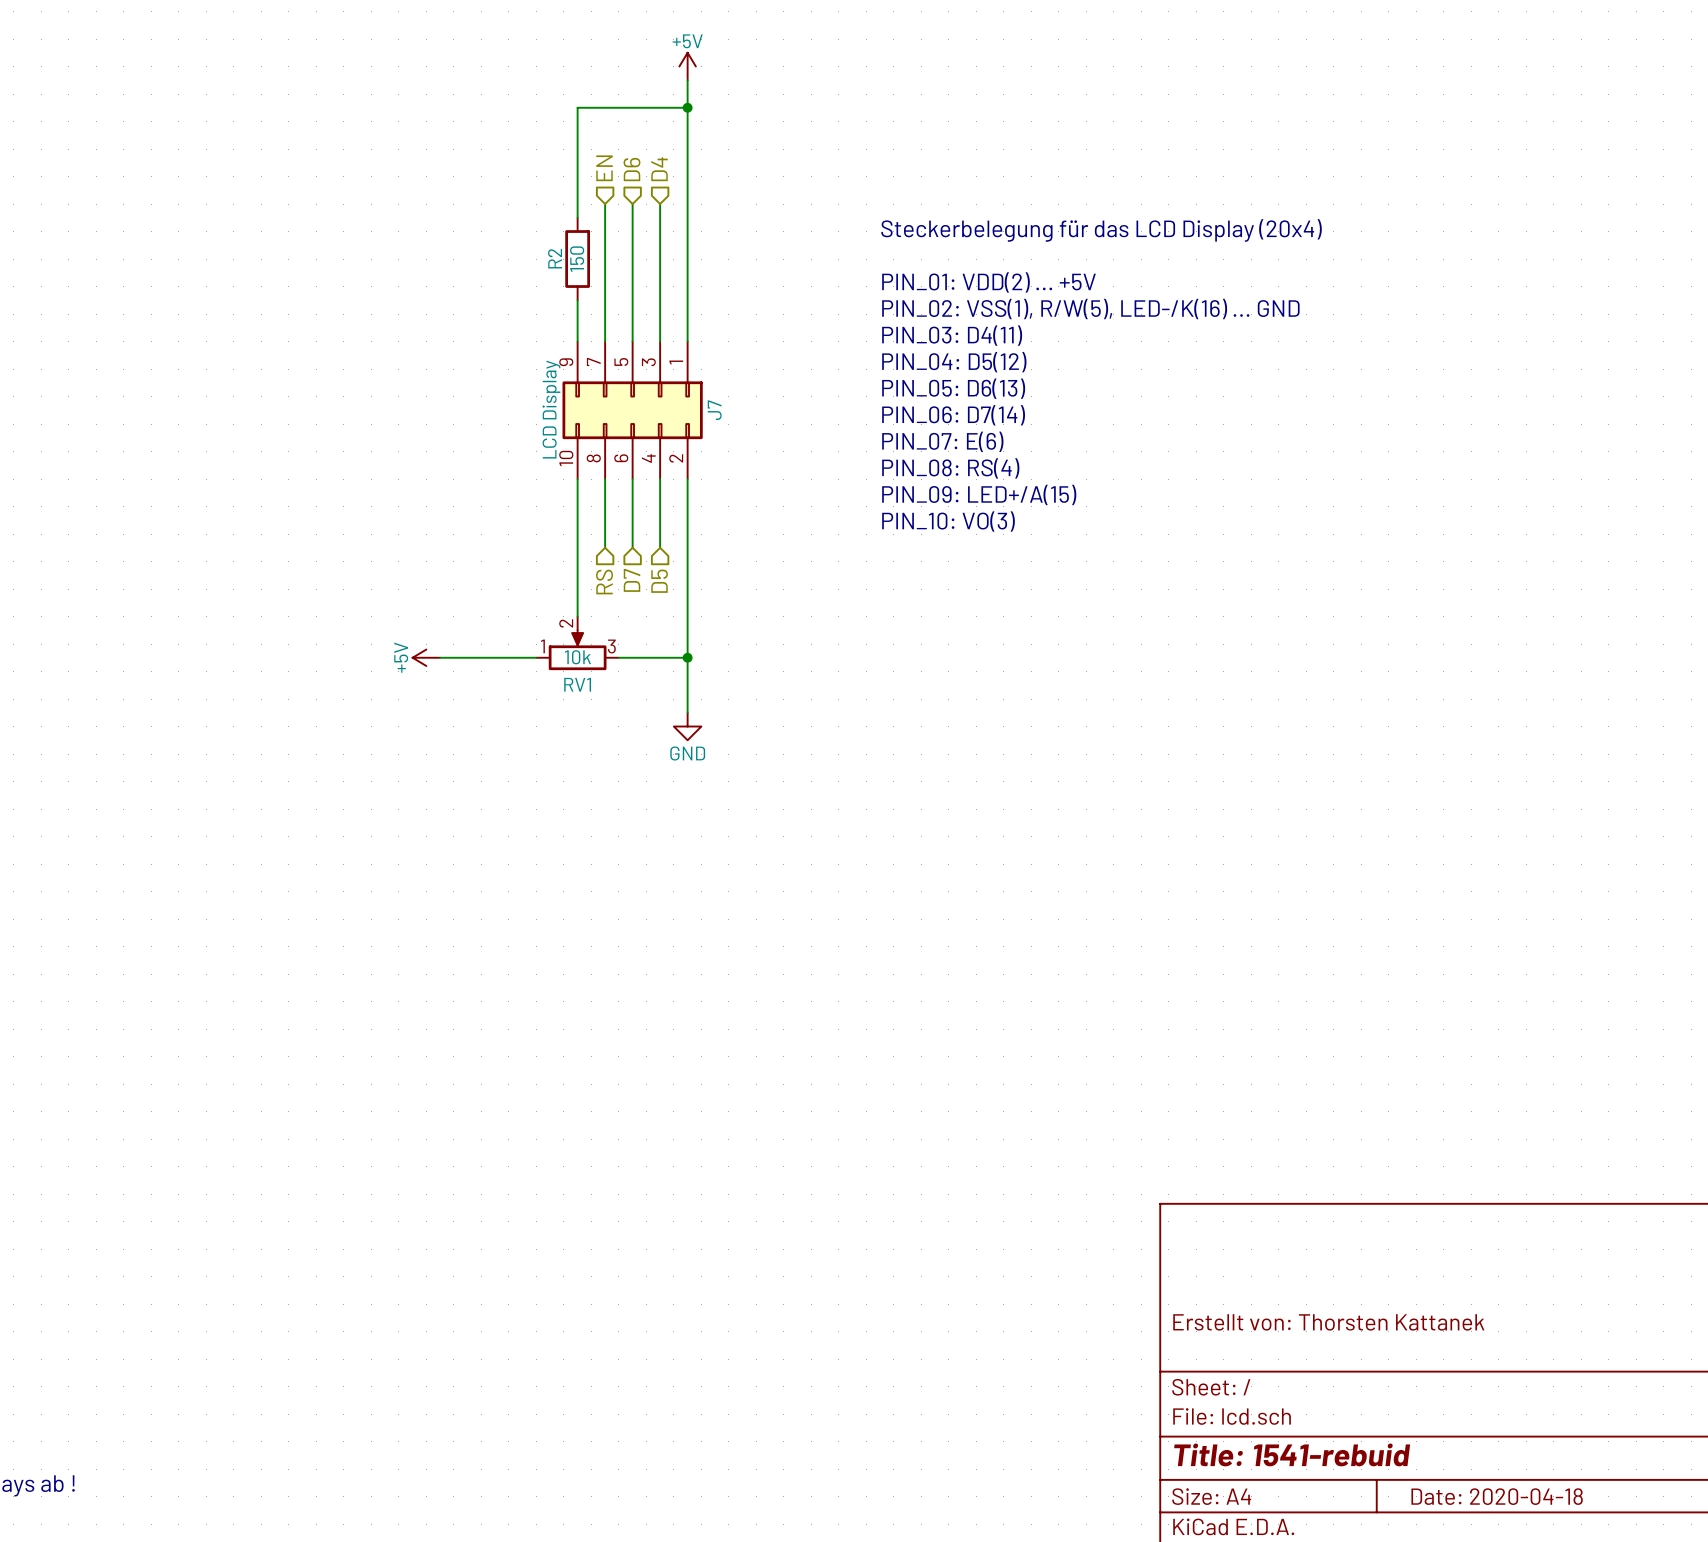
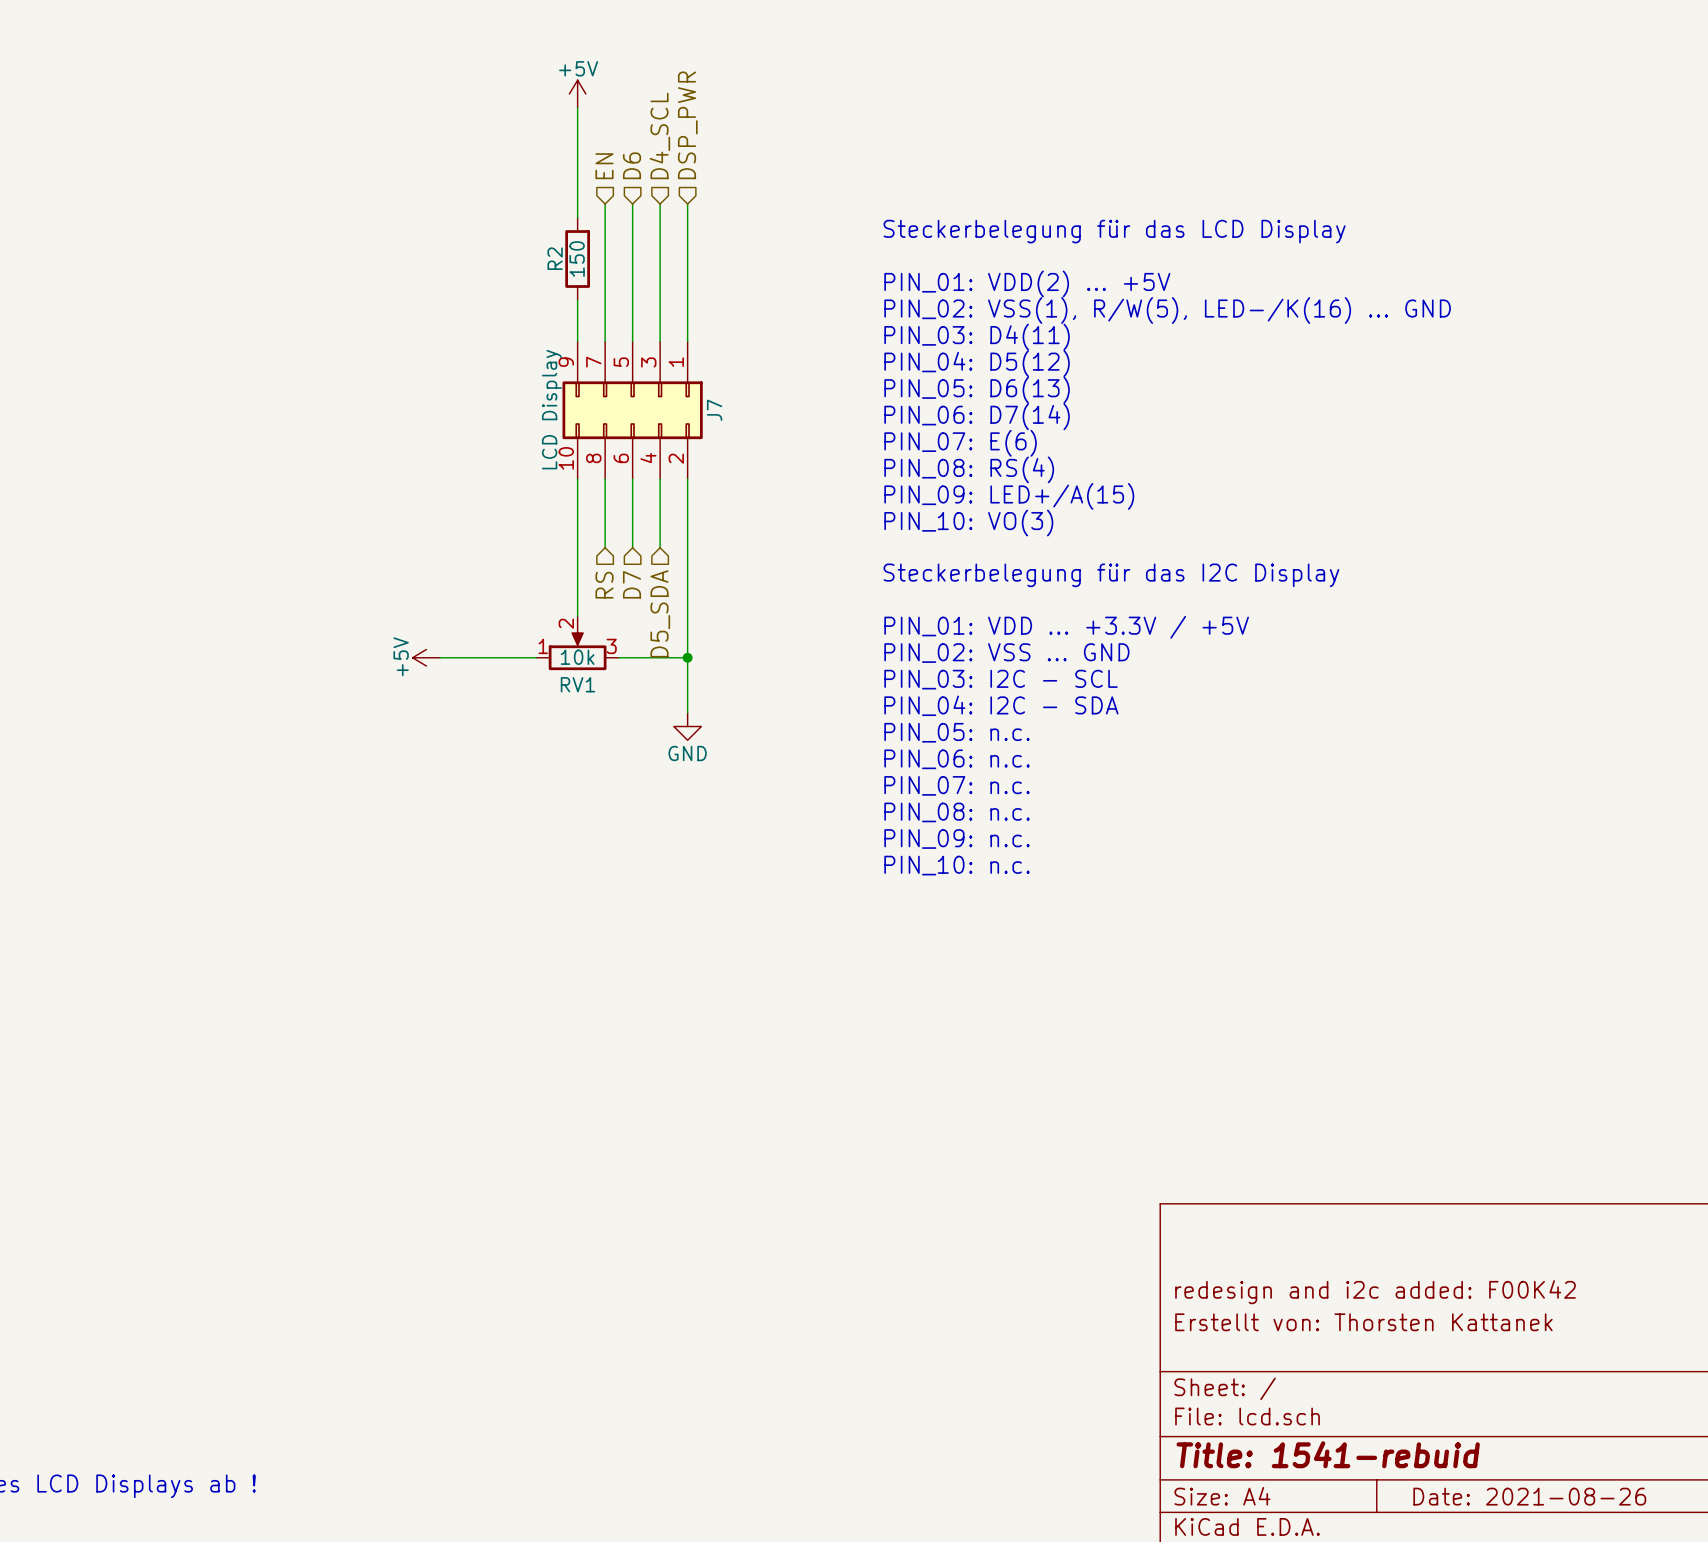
power symbol position: +5V (687, 66) -> +5V (577, 94)
wire: (687, 80) (687, 204) -> none
wire: (577, 107) (687, 107) -> none
junction: (687, 107) -> none
hierarchical label: none -> DSP_PWR (687, 125)
hierarchical label: D4 (659, 169) -> D4_SCL (659, 135)
text: Steckerbelegung für das LCD Display (20x4) (1101, 230) -> Steckerbelegung für das LCD Display (1114, 231)
text: none -> Steckerbelegung für das I2C Display (1111, 575)
hierarchical label: D5 (659, 581) -> D5_SDA (660, 613)
text: none -> PIN_01: VDD ... +3.3V / +5V (1066, 627)
text: none -> PIN_02: VSS ... GND (1006, 653)
text: none -> PIN_03: I2C - SCL (1001, 679)
text: none -> PIN_04: I2C - SDA (1001, 705)
text: none -> PIN_05: n.c. (957, 732)
text: none -> PIN_06: n.c. (957, 759)
text: none -> PIN_07: n.c. (957, 785)
text: none -> PIN_08: n.c. (957, 812)
text: none -> PIN_09: n.c. (957, 839)
text: none -> PIN_10: n.c. (957, 865)
title block: none -> redesign and i2c added: F00K42 (1375, 1292)
title block: Date: 2020-04-18 (1497, 1496) -> Date: 2021-08-26 (1529, 1496)

